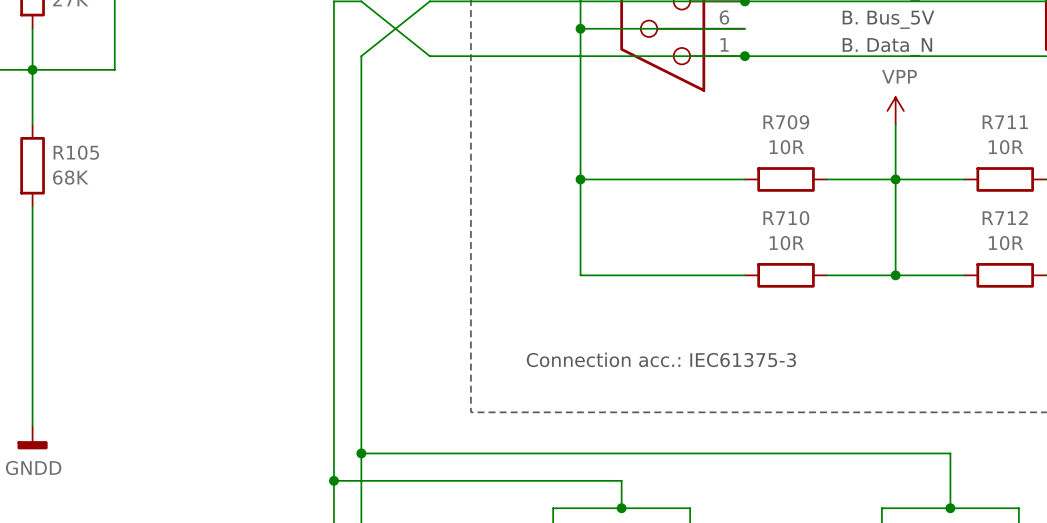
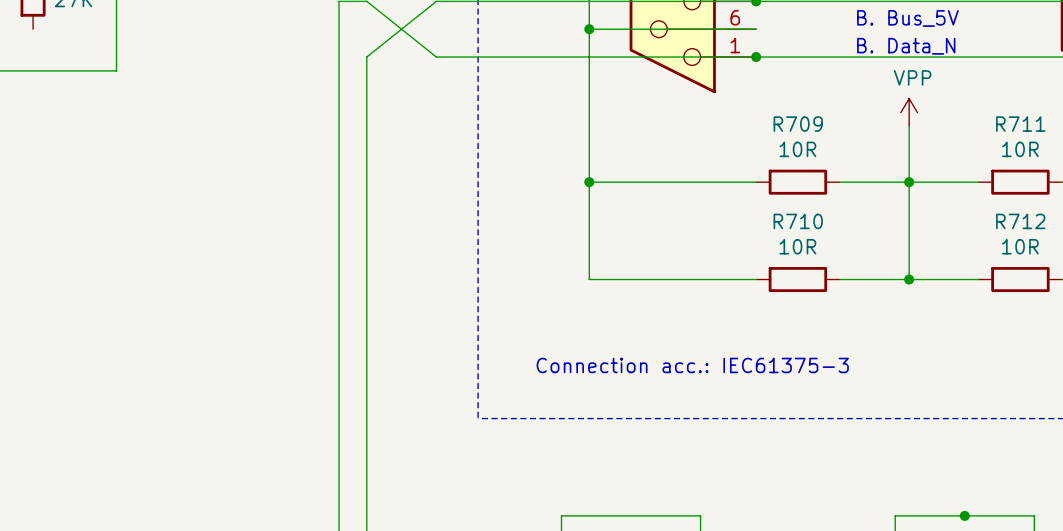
wire: (32, 28) (32, 124) -> none
junction: (32, 69) -> none
R105: 68K (32, 165) -> none
wire: (32, 206) (32, 426) -> none
power symbol: GNDD (32, 437) -> none
wire: (361, 453) (950, 453) (950, 508) -> none
junction: (361, 453) -> none
wire: (333, 480) (621, 480) (621, 508) -> none
junction: (333, 480) -> none
junction: (621, 508) -> none

